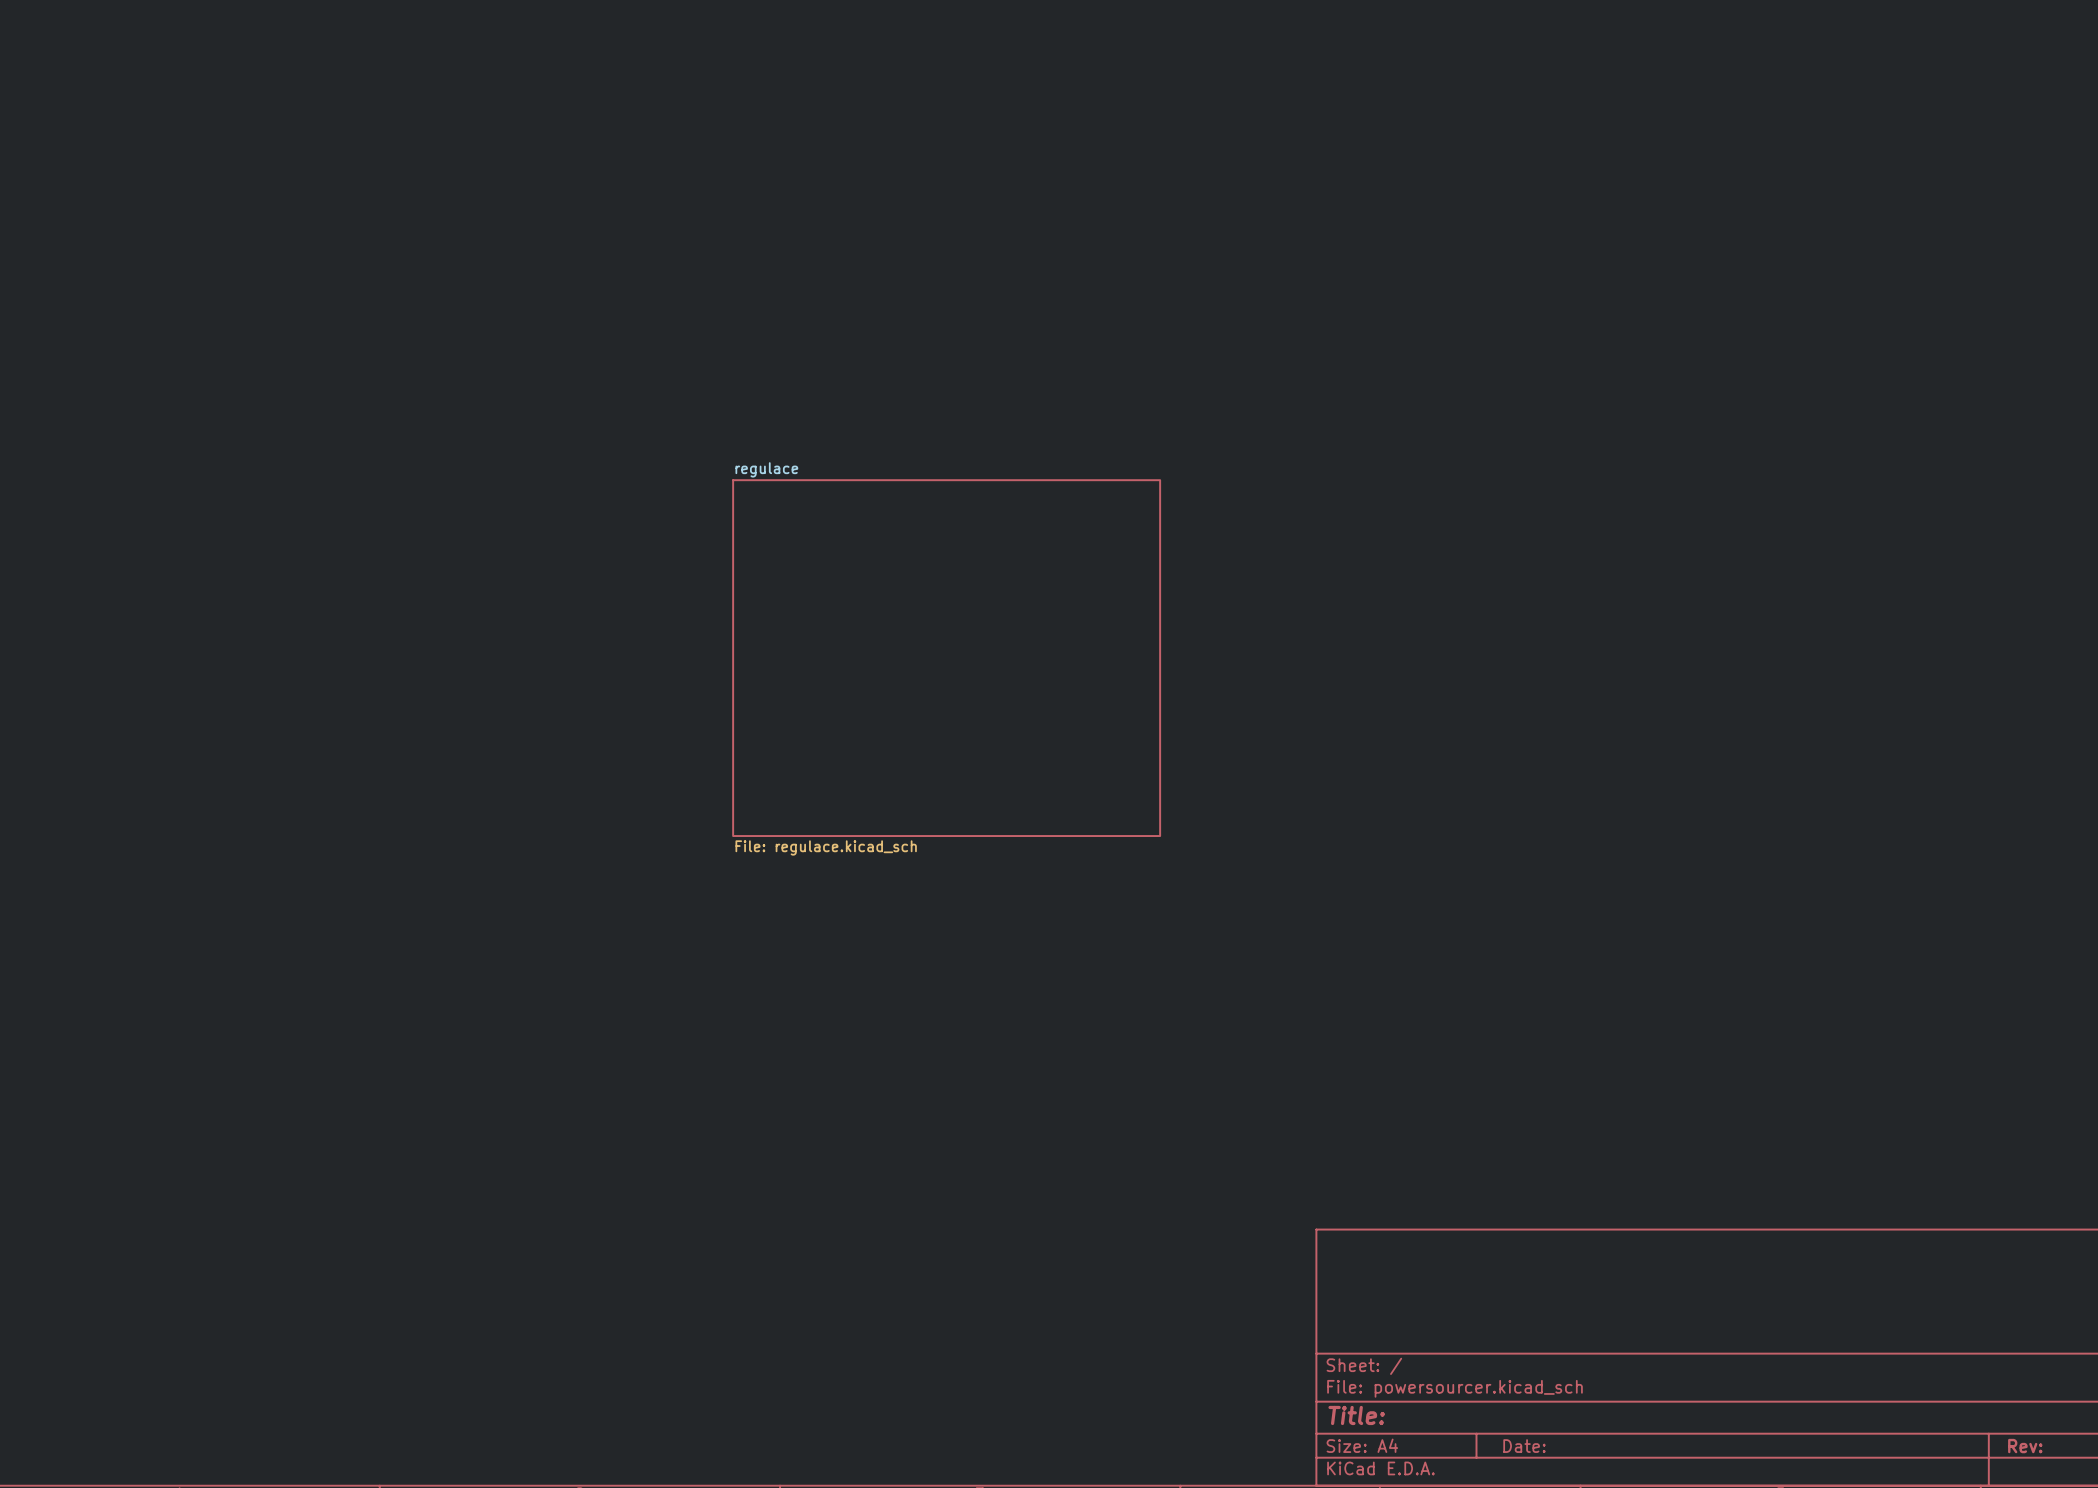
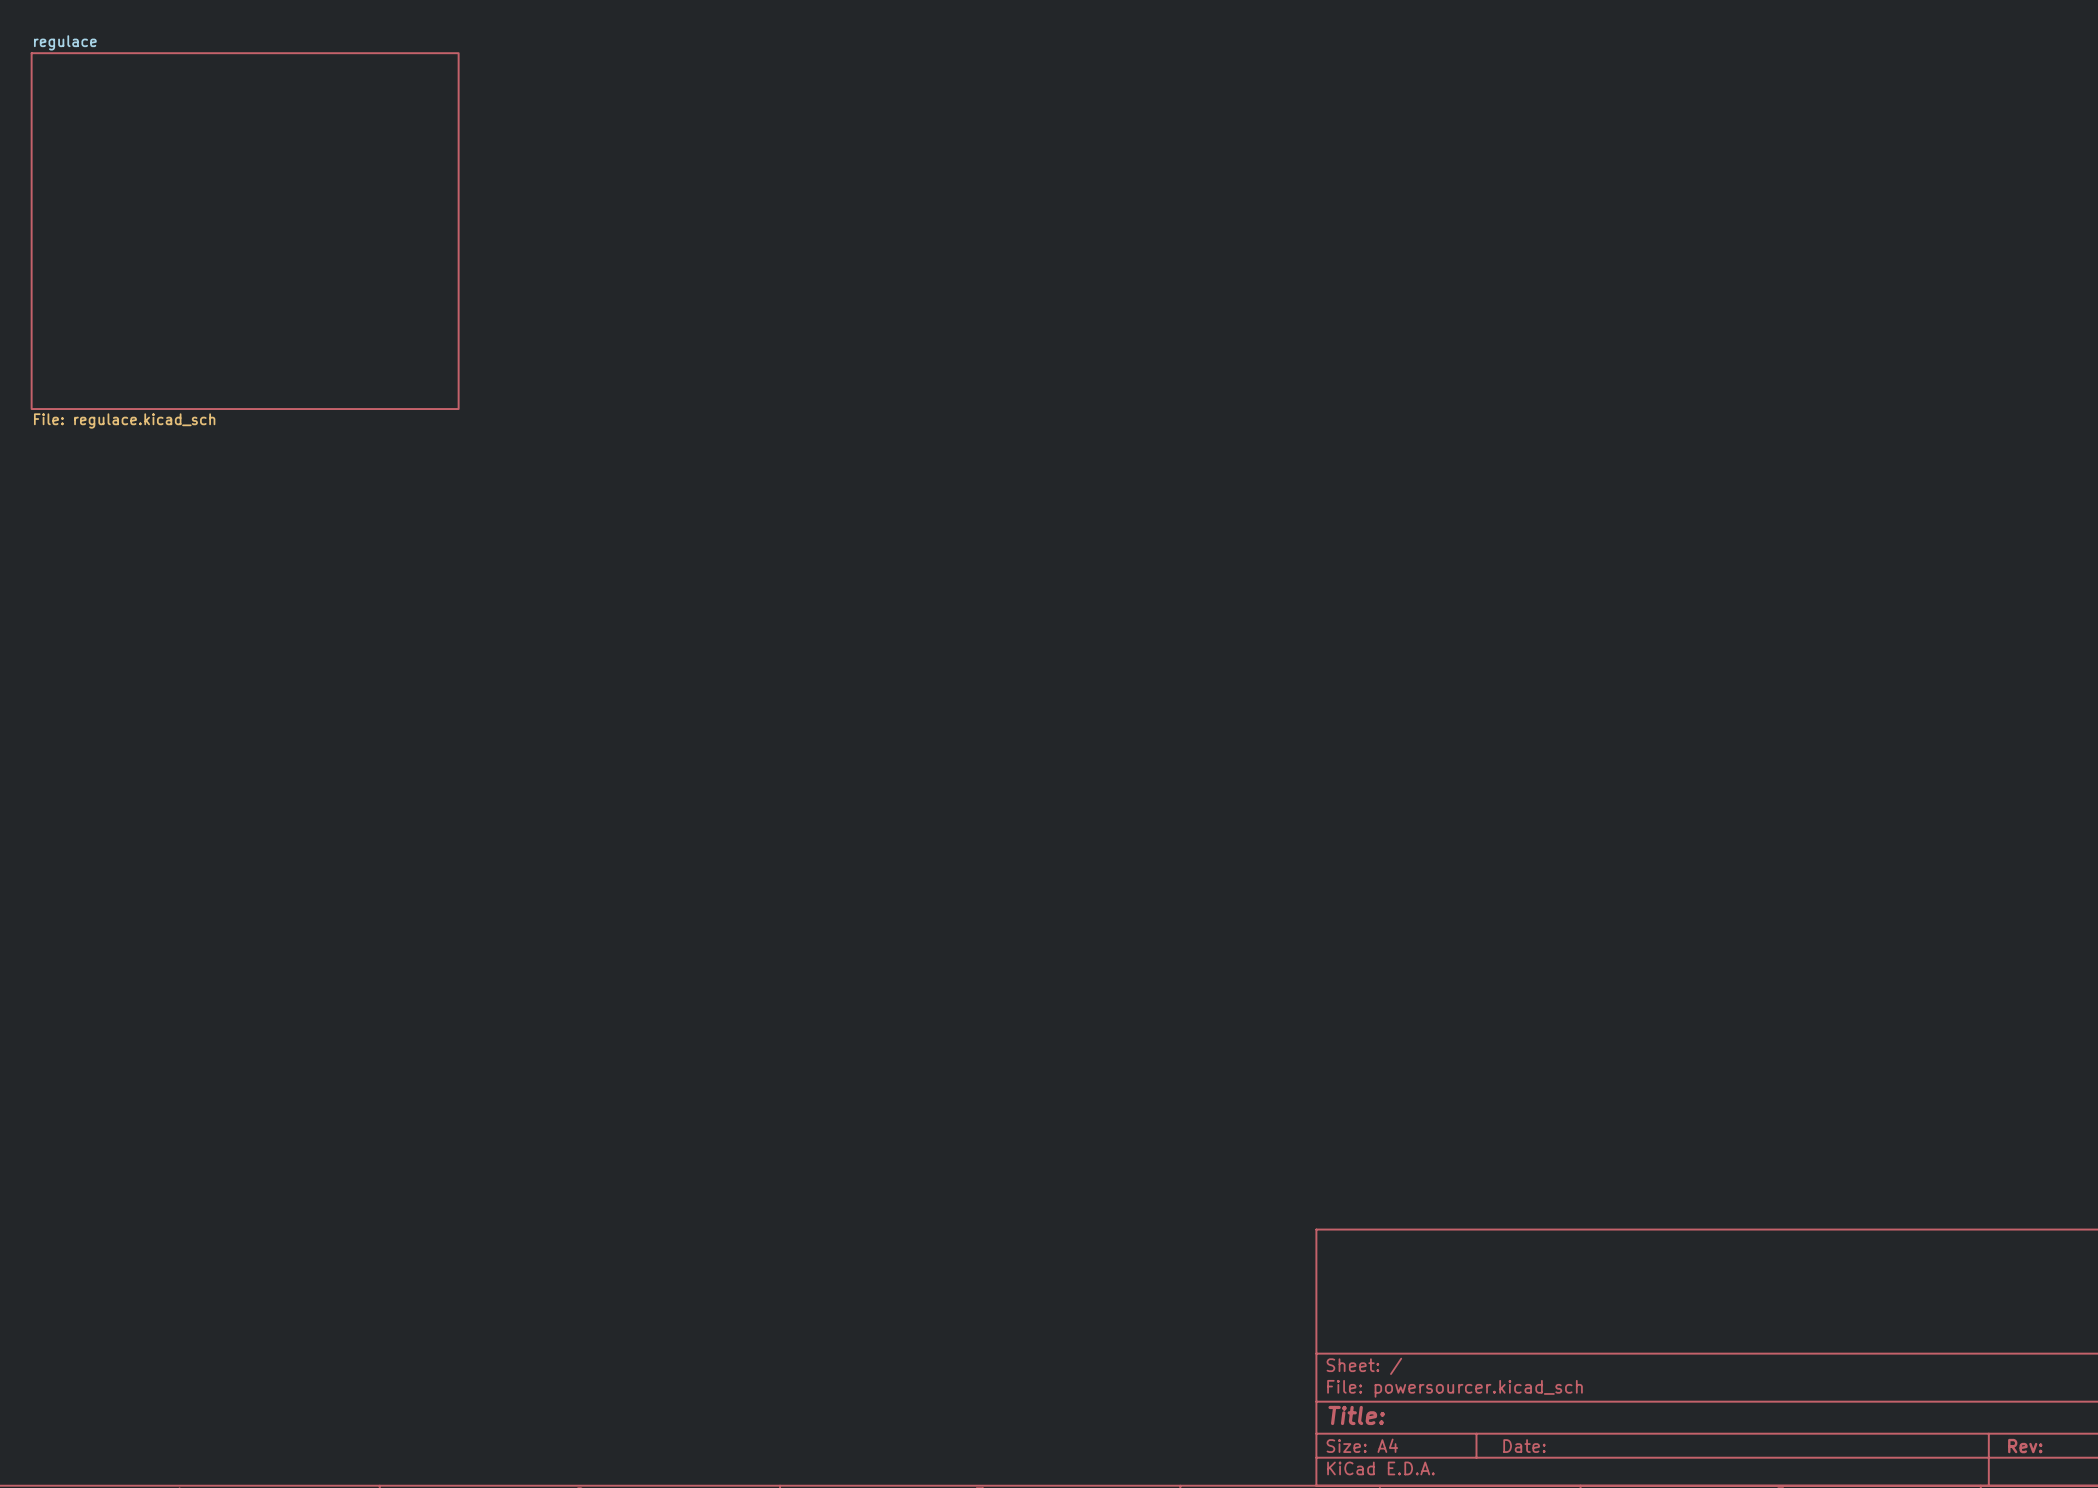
sheet regulace: none -> File: regulace.kicad_sch (245, 231)
sheet regulace: File: regulace.kicad_sch (946, 658) -> none

